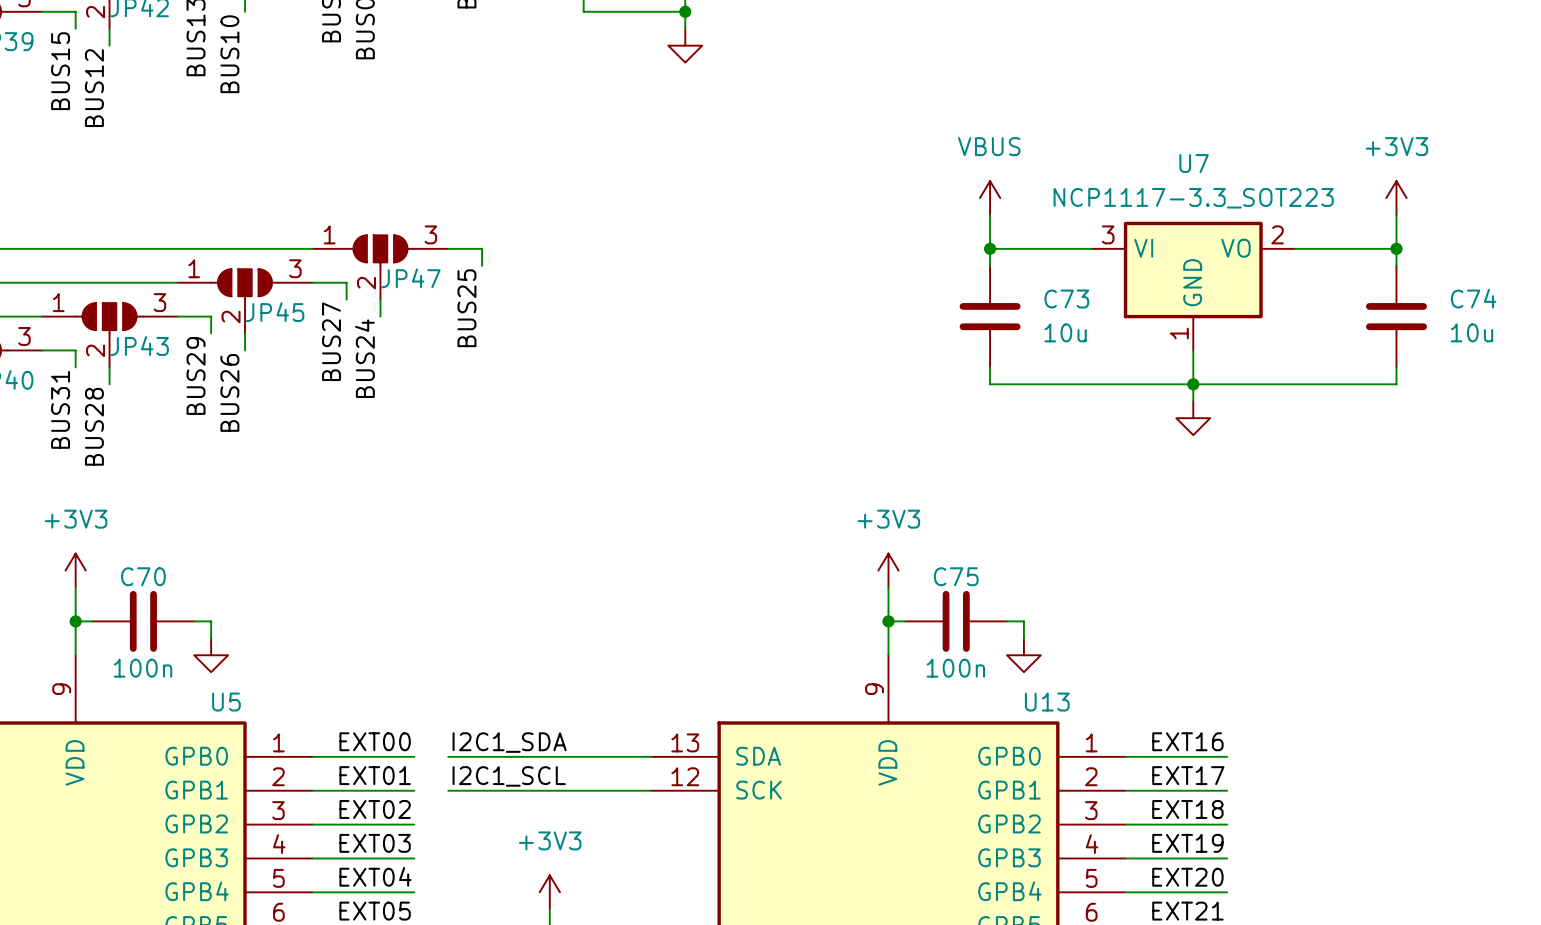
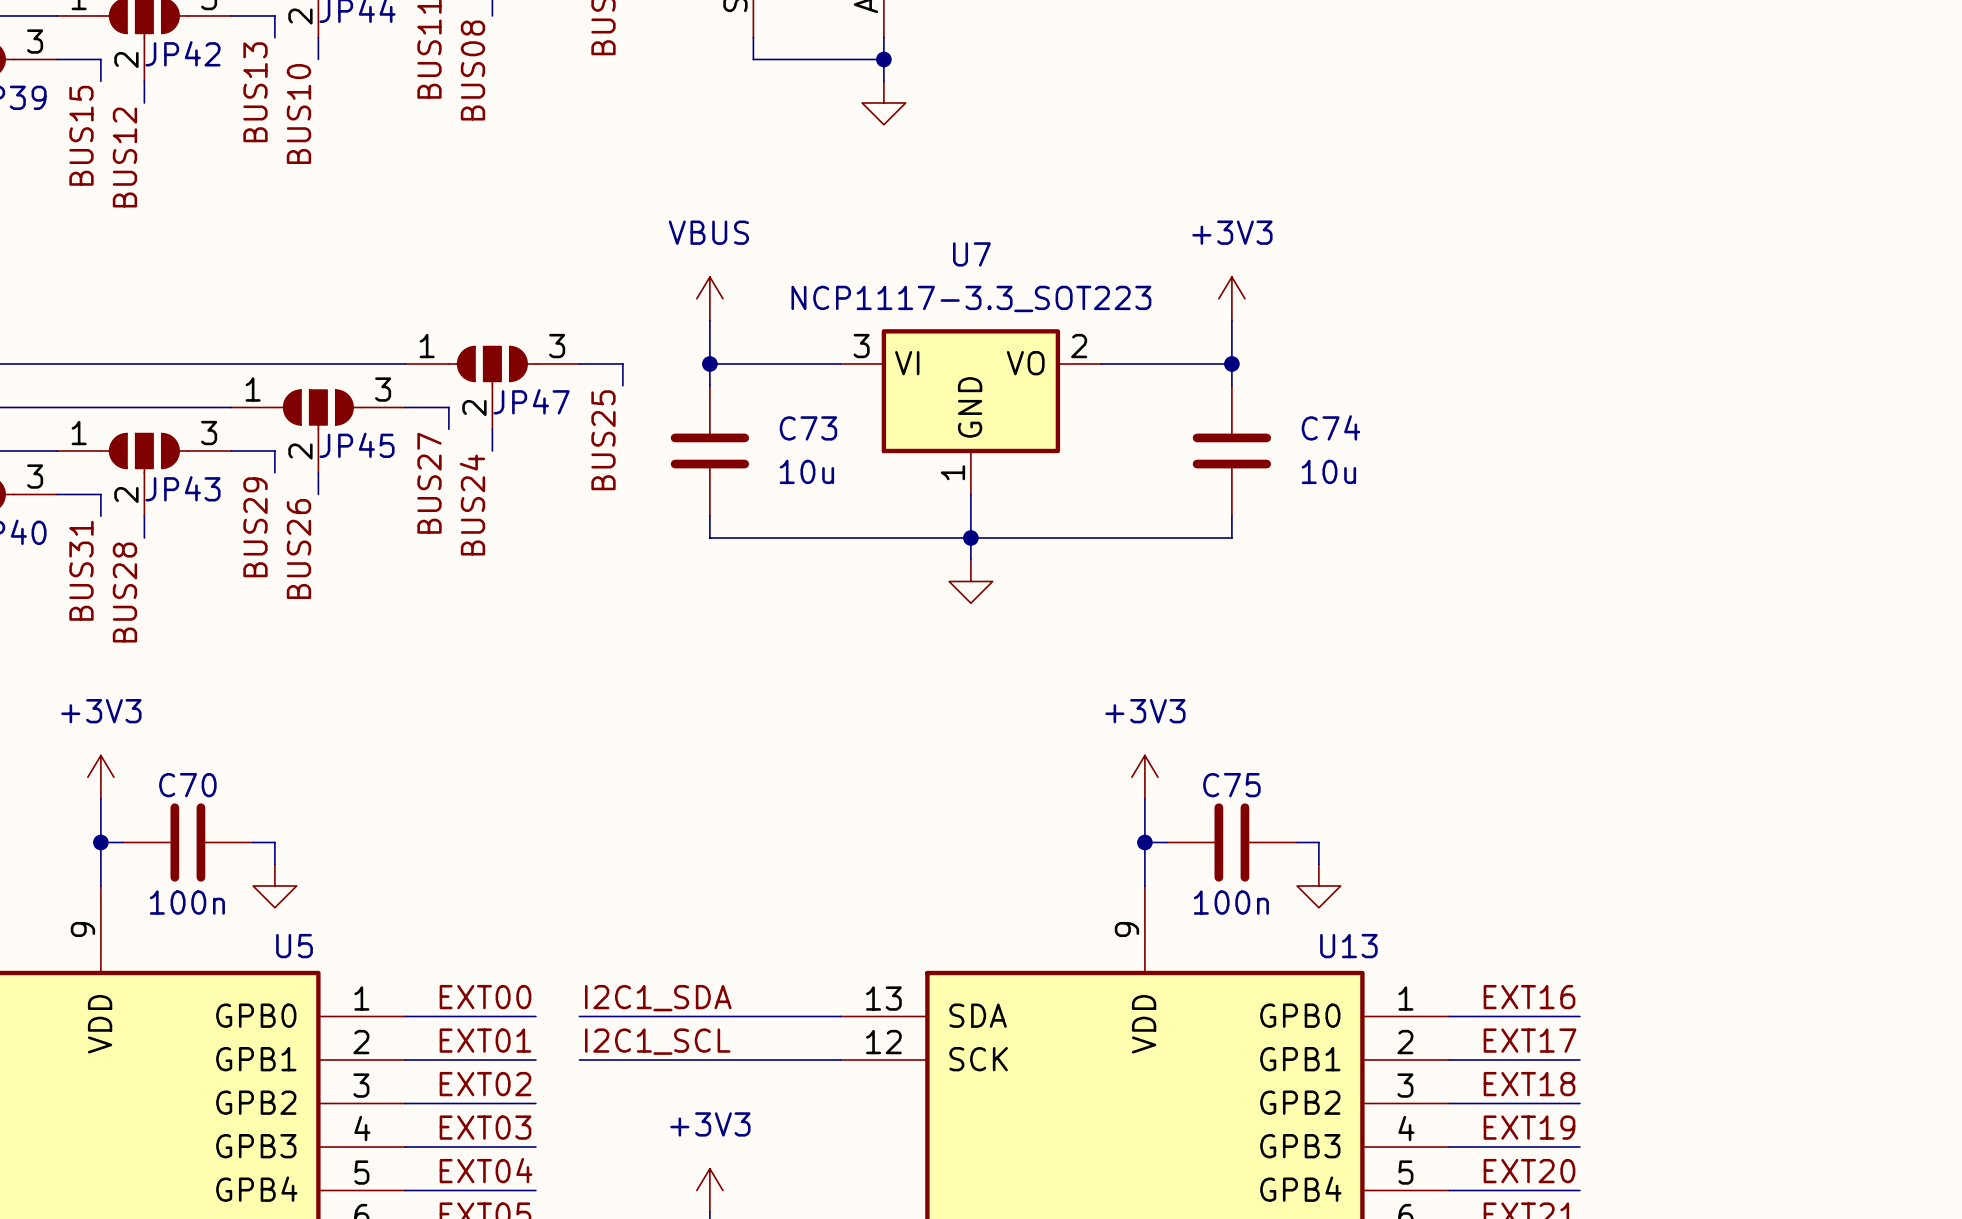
power symbol: none -> VBUS (709, 298)
power symbol: none -> +3V3 (1231, 298)
power symbol: VBUS (990, 198) -> none
power symbol: +3V3 (1396, 198) -> none
wire: none -> (709, 320) (709, 385)
wire: (990, 214) (990, 265) -> (1231, 320) (1231, 385)
wire: (1396, 214) (1396, 265) -> none
wire: none -> (709, 363) (840, 363)
junction: none -> (709, 363)
wire: (990, 248) (1091, 248) -> (1101, 363) (1231, 363)
junction position: (990, 248) -> (1231, 363)
wire: (1294, 248) (1396, 248) -> none
junction: (1396, 248) -> none
U7 position: (1193, 286) -> (970, 411)
C73 position: (990, 316) -> (709, 450)
C74 position: (1396, 316) -> (1231, 450)
wire: none -> (970, 494) (970, 559)
wire: (1193, 350) (1193, 401) -> none
wire: none -> (709, 516) (709, 537) (1231, 537) (1231, 516)
wire: (990, 367) (990, 384) (1396, 384) (1396, 367) -> none
junction: none -> (970, 537)
junction: (1193, 384) -> none
power symbol: none -> (970, 581)
power symbol: (1193, 418) -> none

